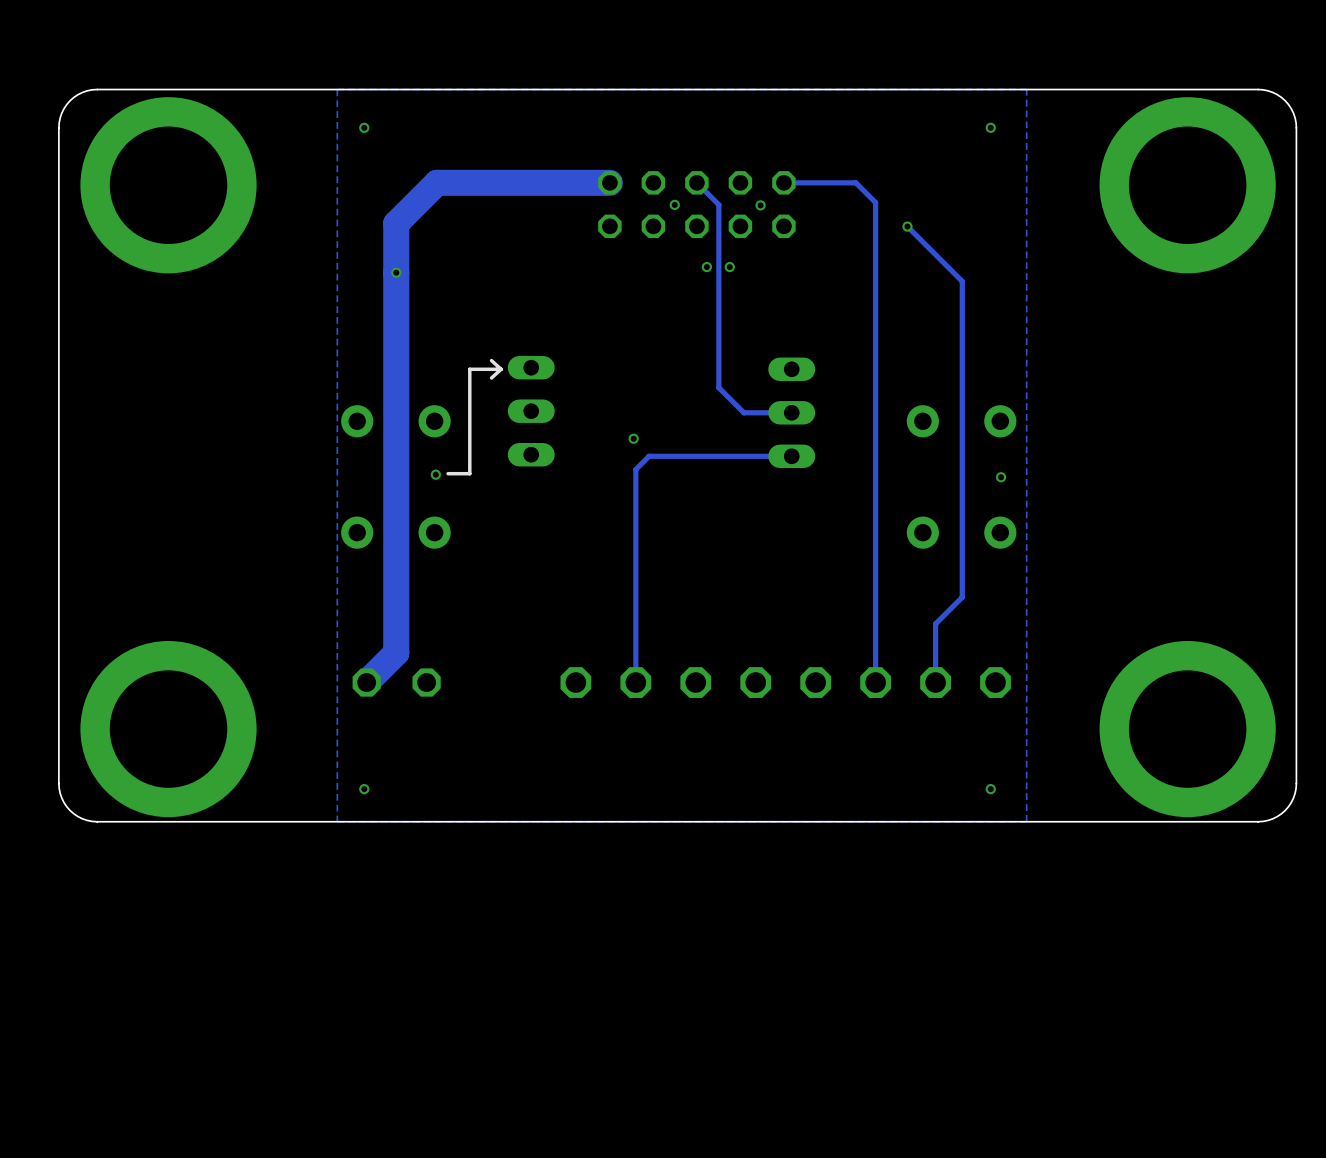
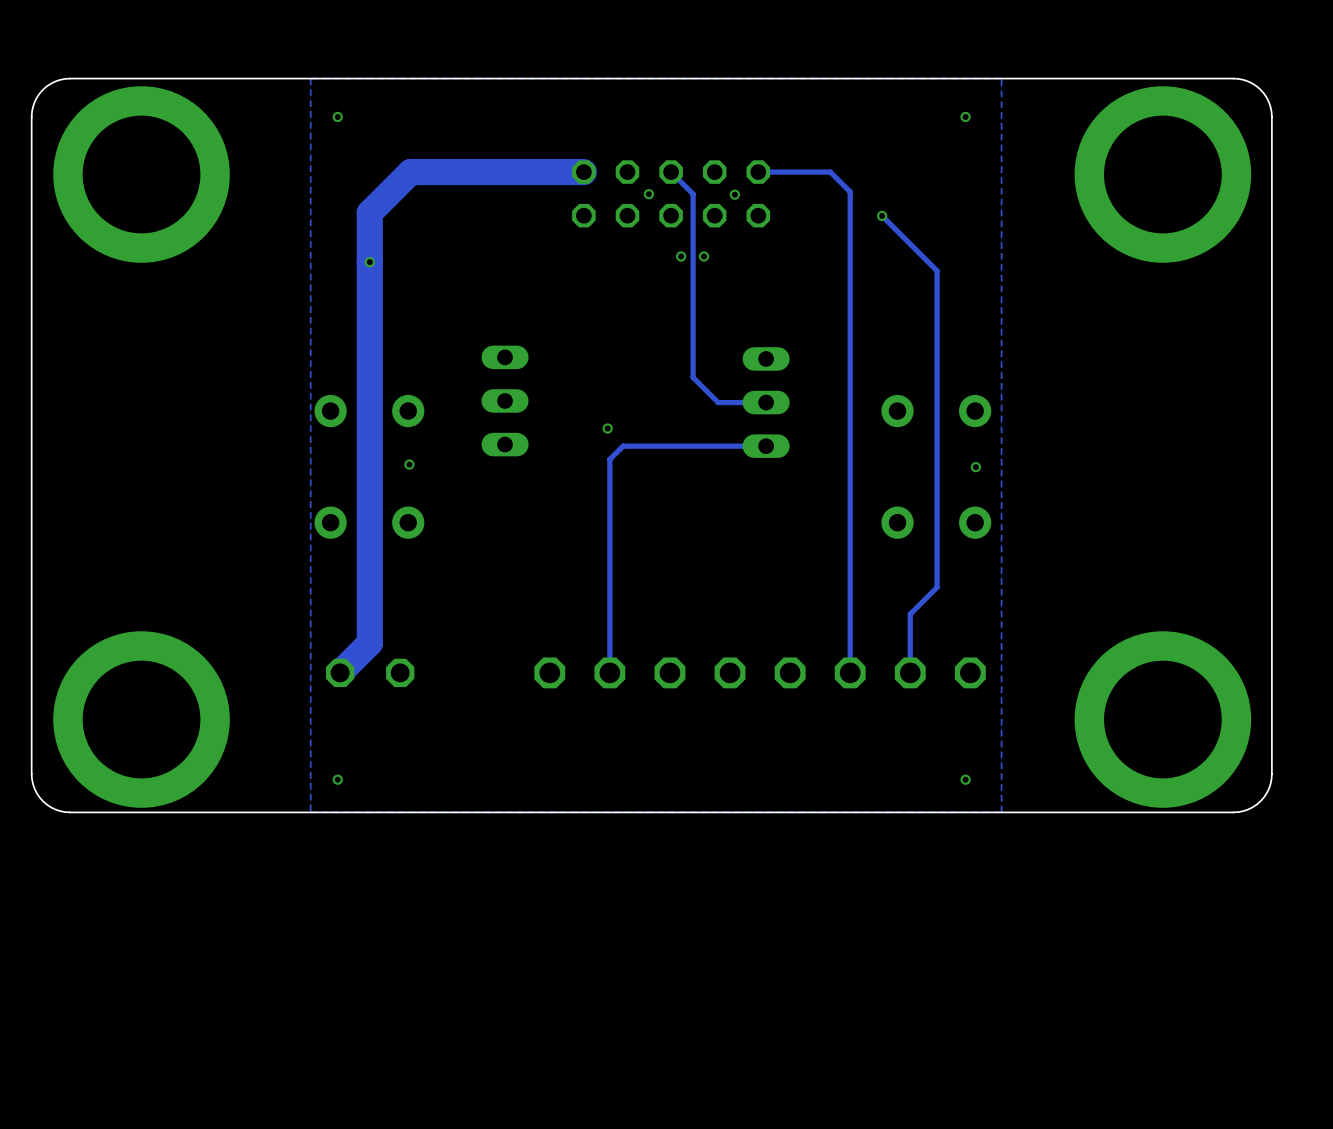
line: (491, 360) (501, 369) -> none
line: (501, 369) (469, 369) (469, 473) (448, 473) -> none
line: (501, 369) (491, 377) -> none

